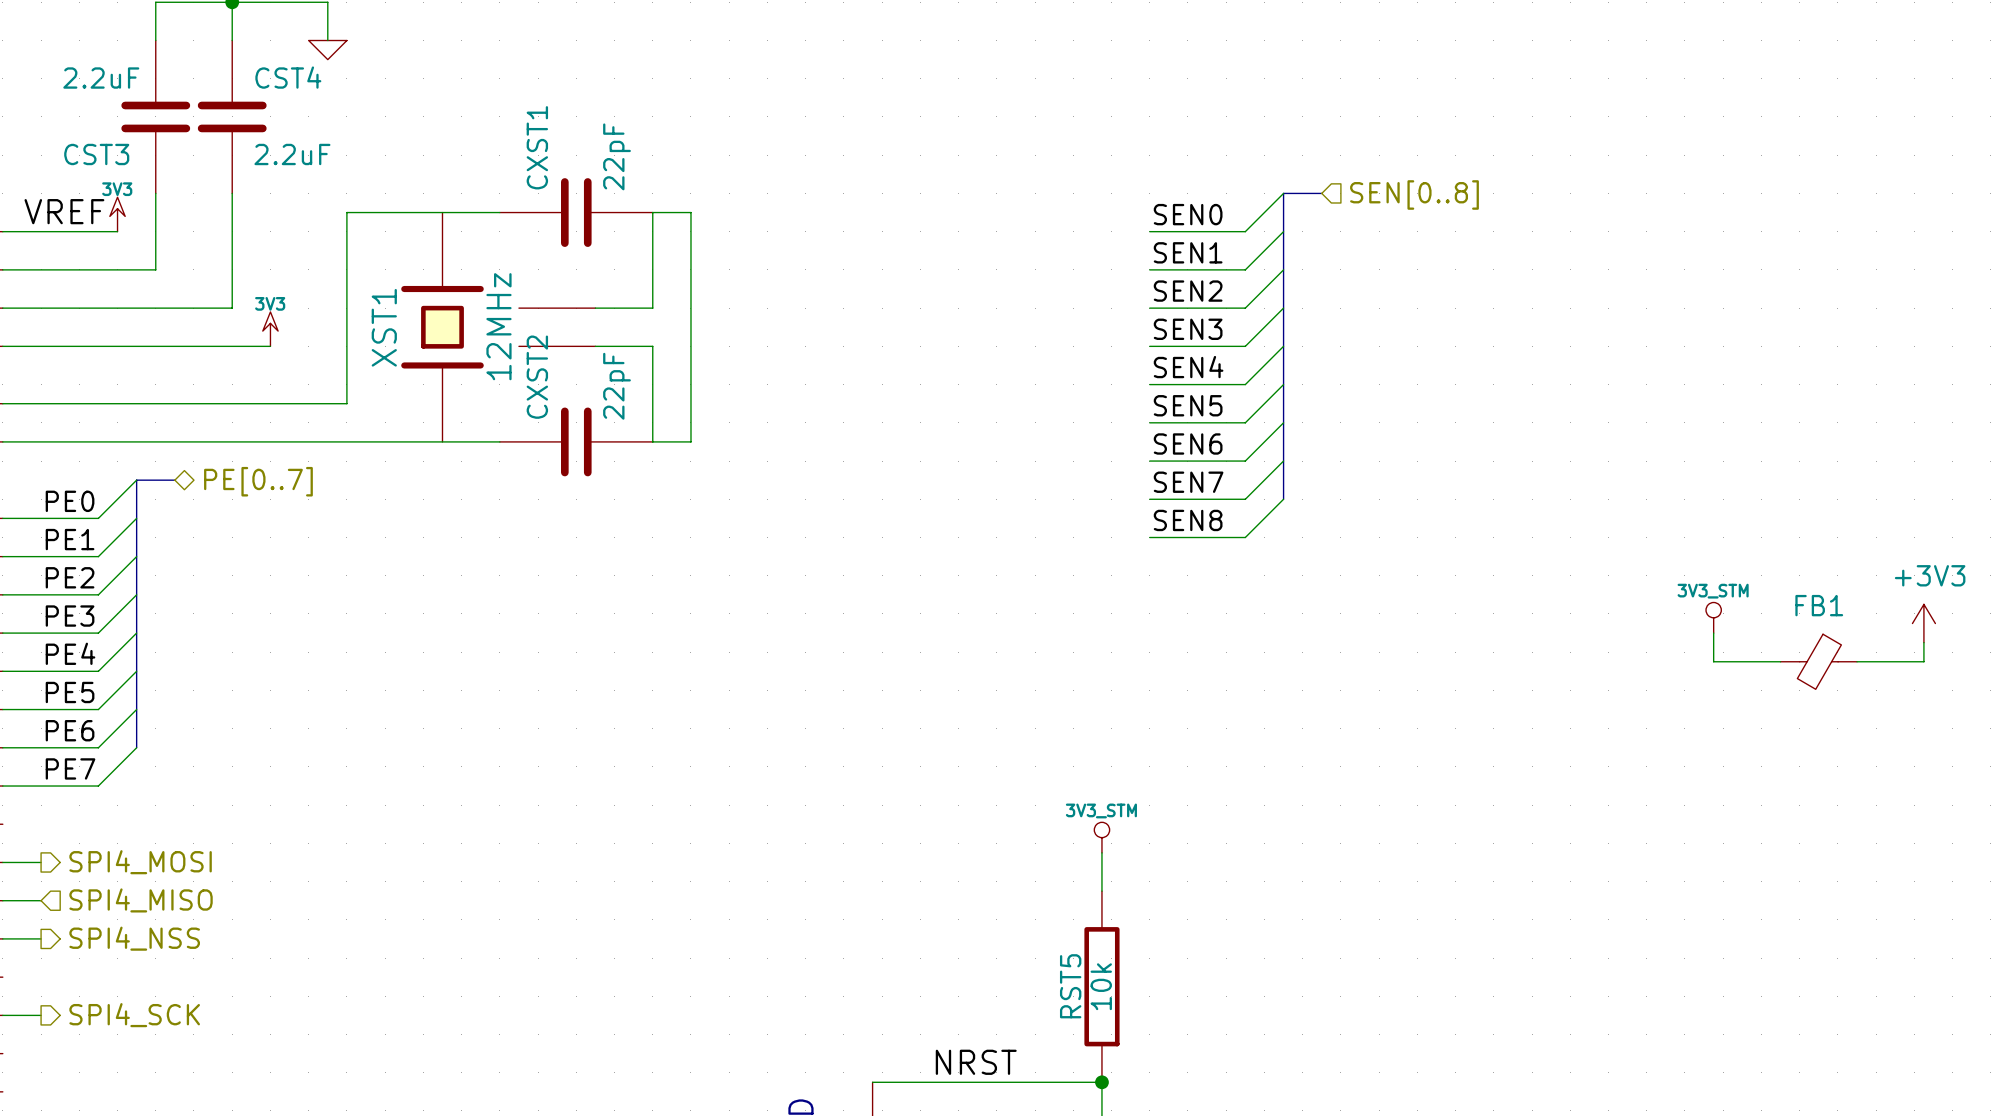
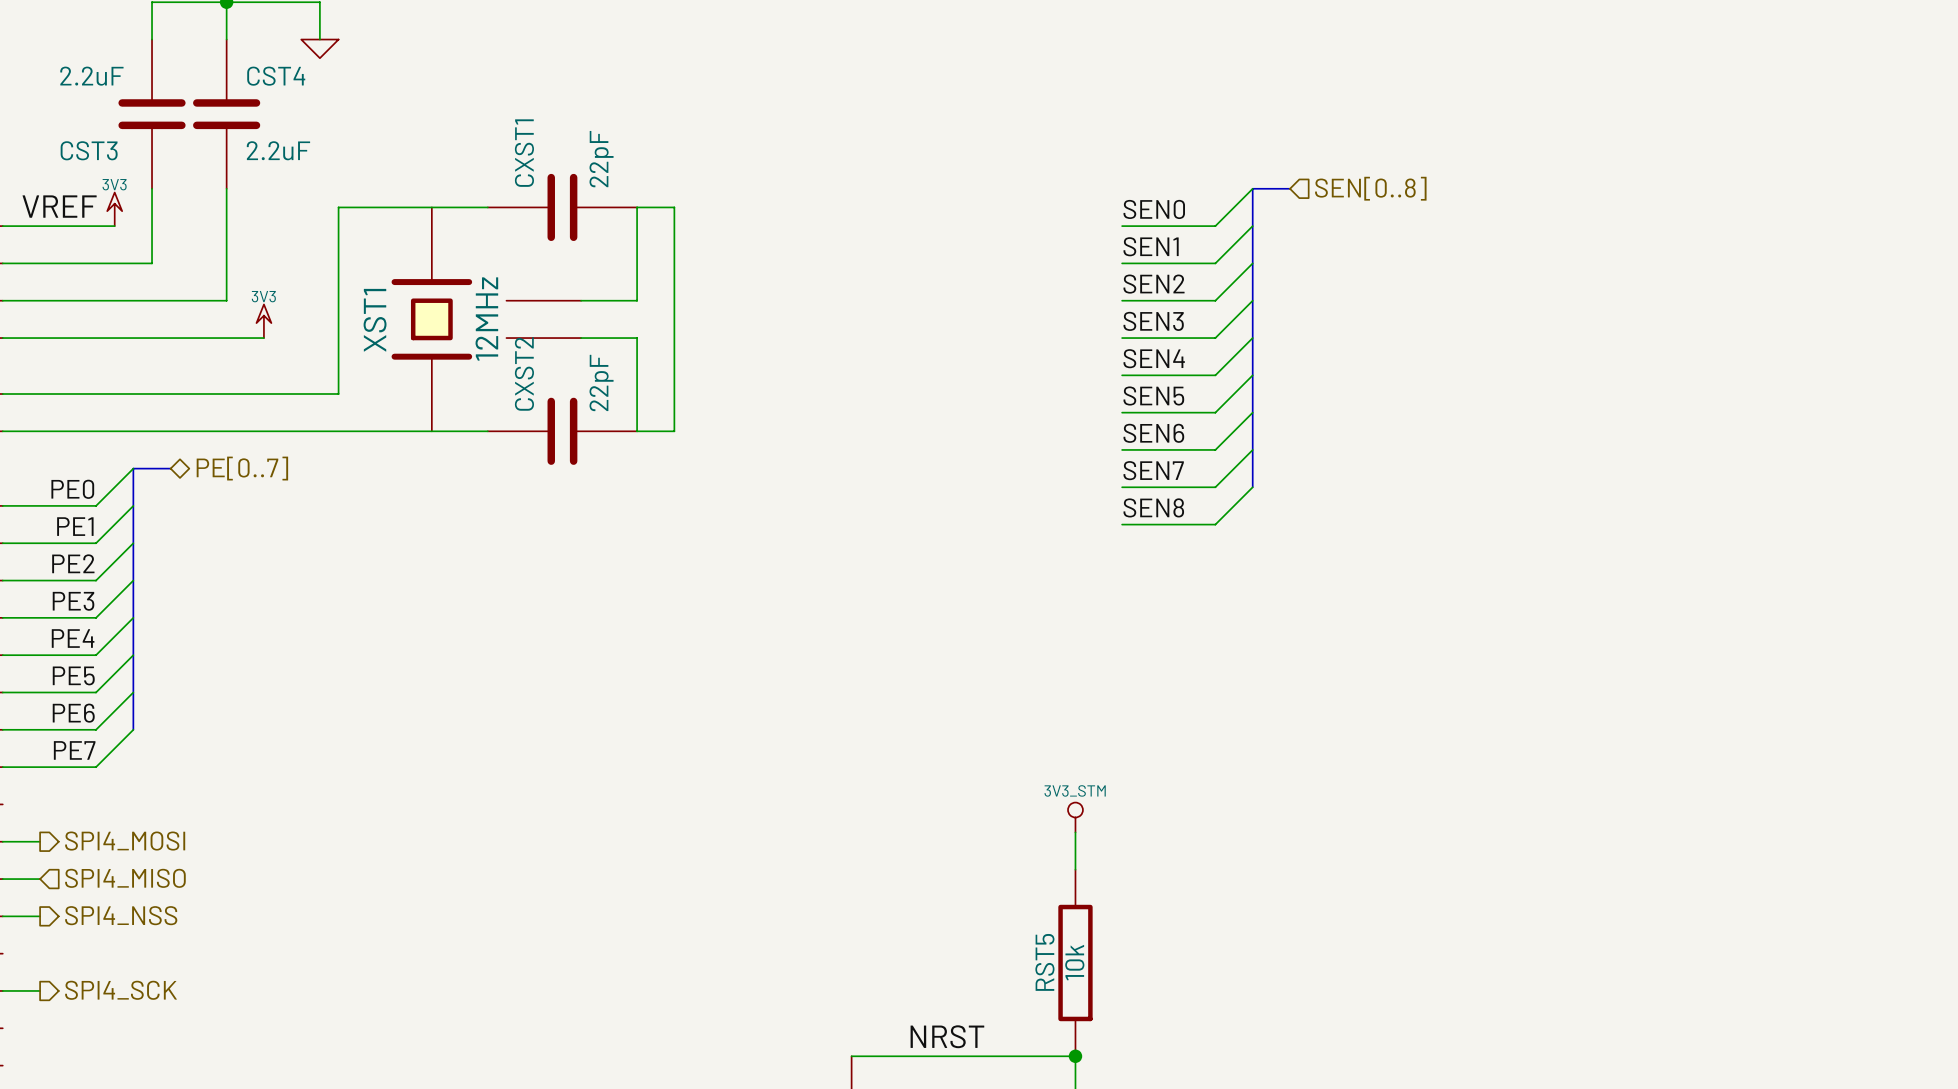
power symbol: 3V3_STM (1713, 617) -> none
power symbol: +3V3 (1923, 623) -> none
wire: (1713, 633) (1713, 661) (1780, 661) -> none
wire: (1923, 642) (1923, 661) (1857, 661) -> none
FB1: (1818, 661) -> none

